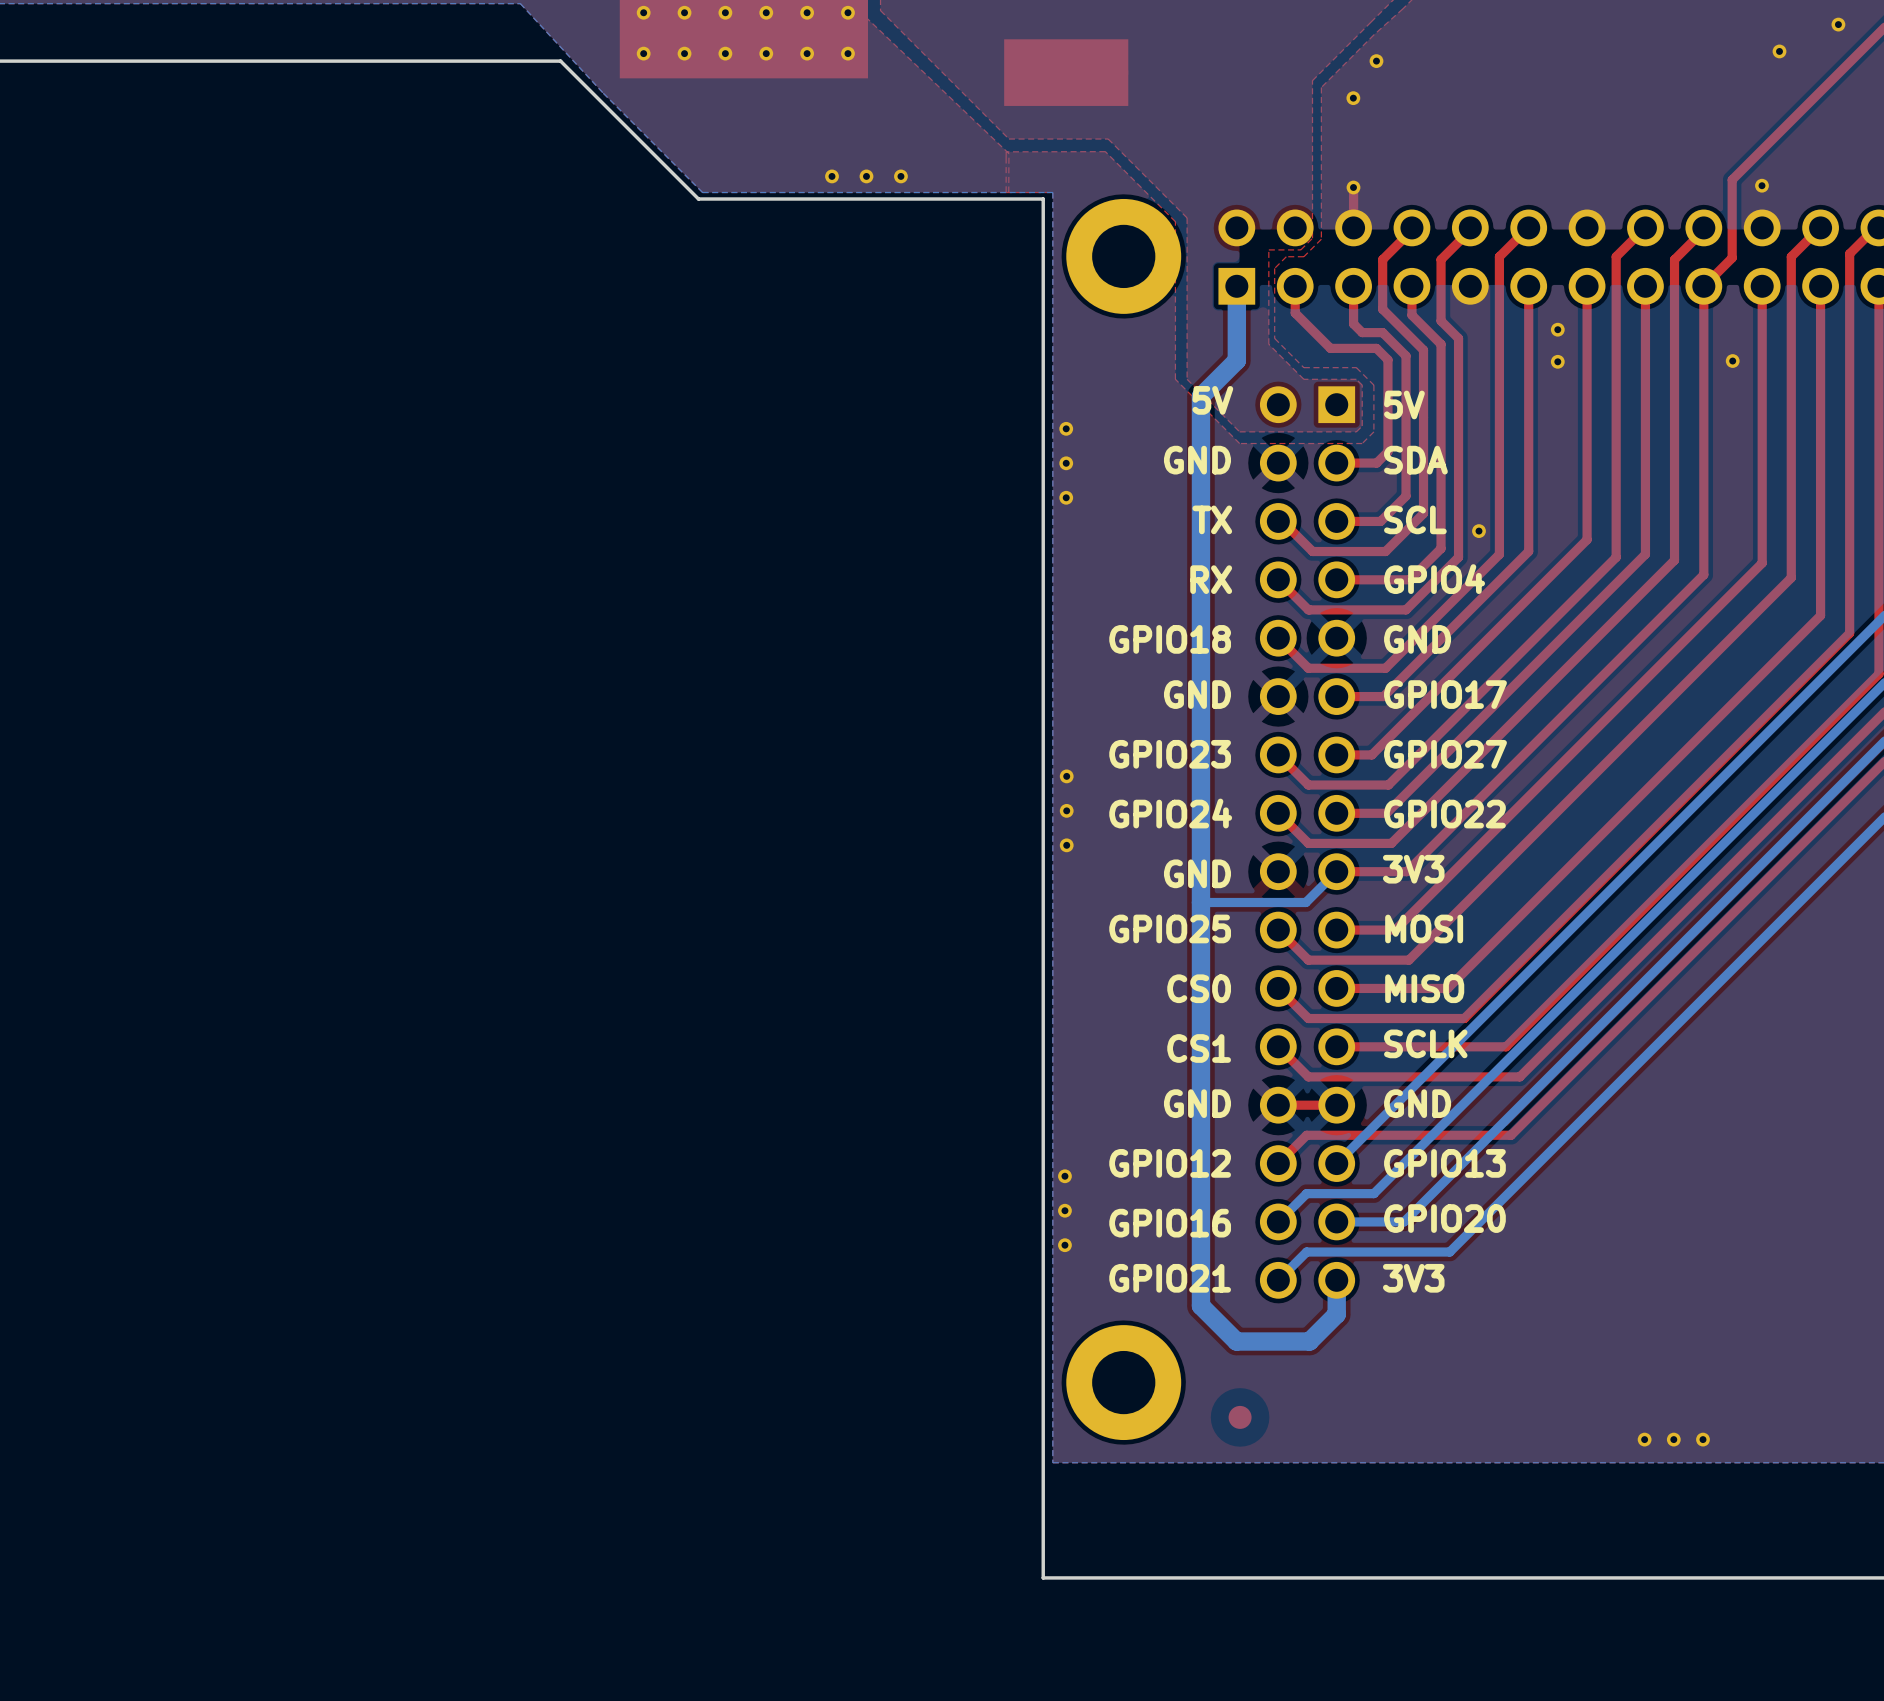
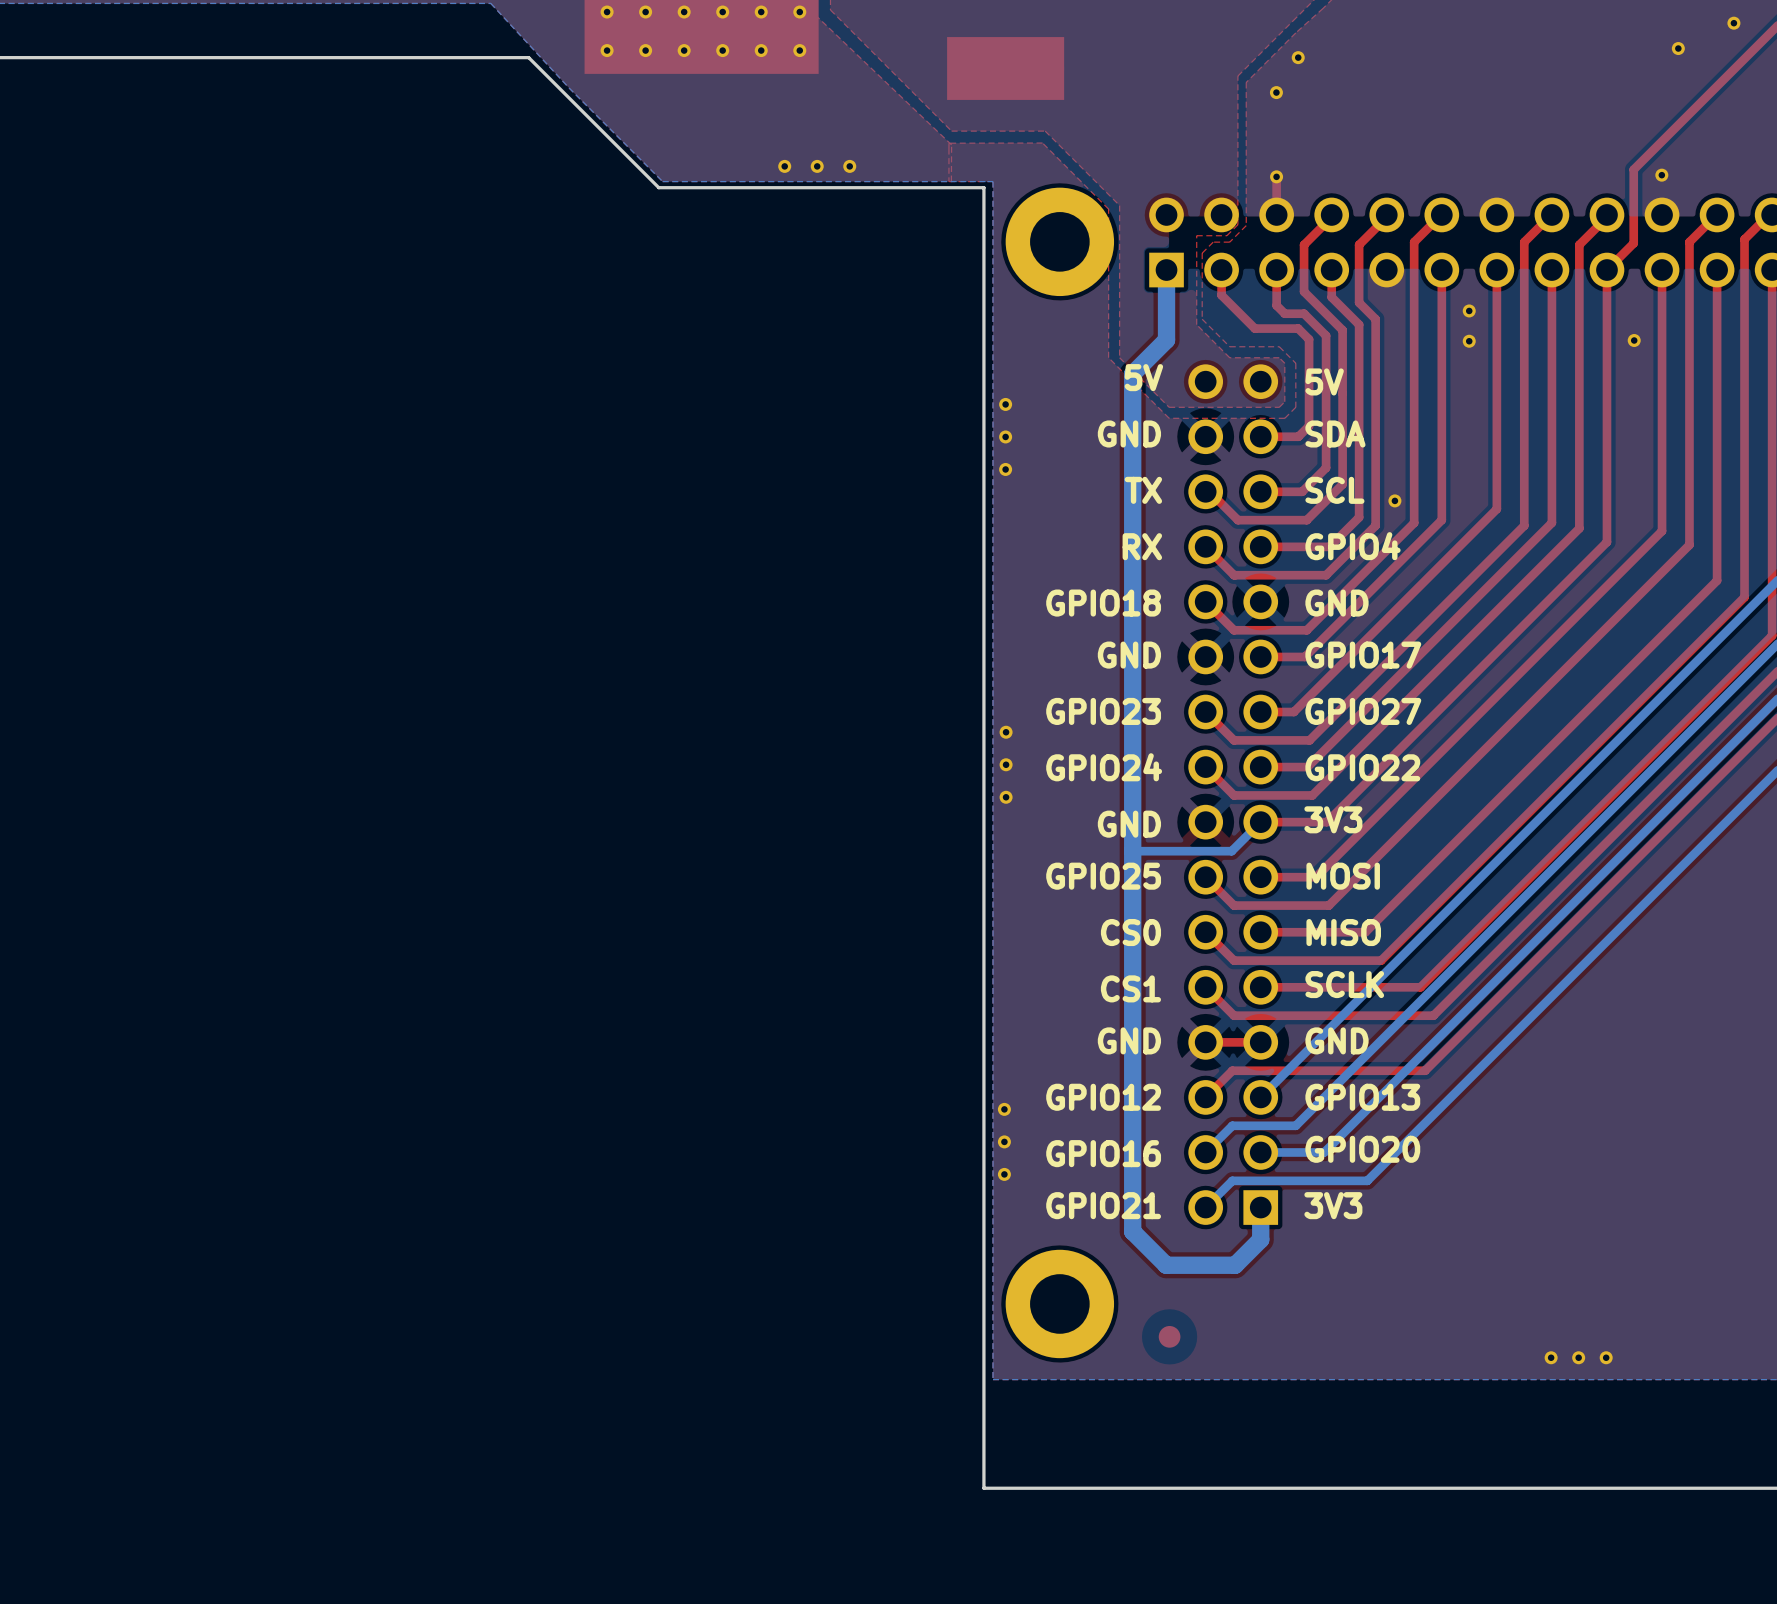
part footprint: [1259, 386, 1356, 1299] -> [1188, 364, 1279, 1225]

